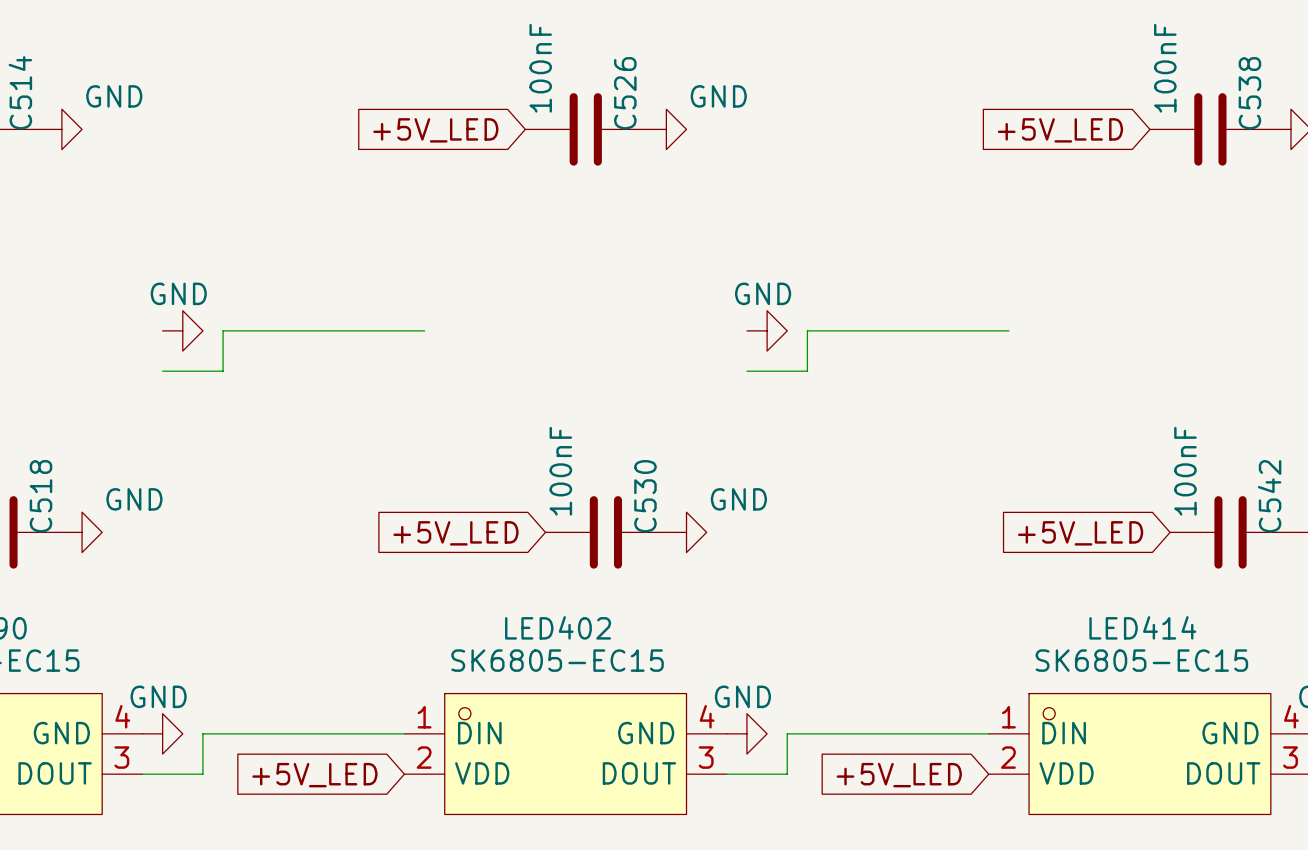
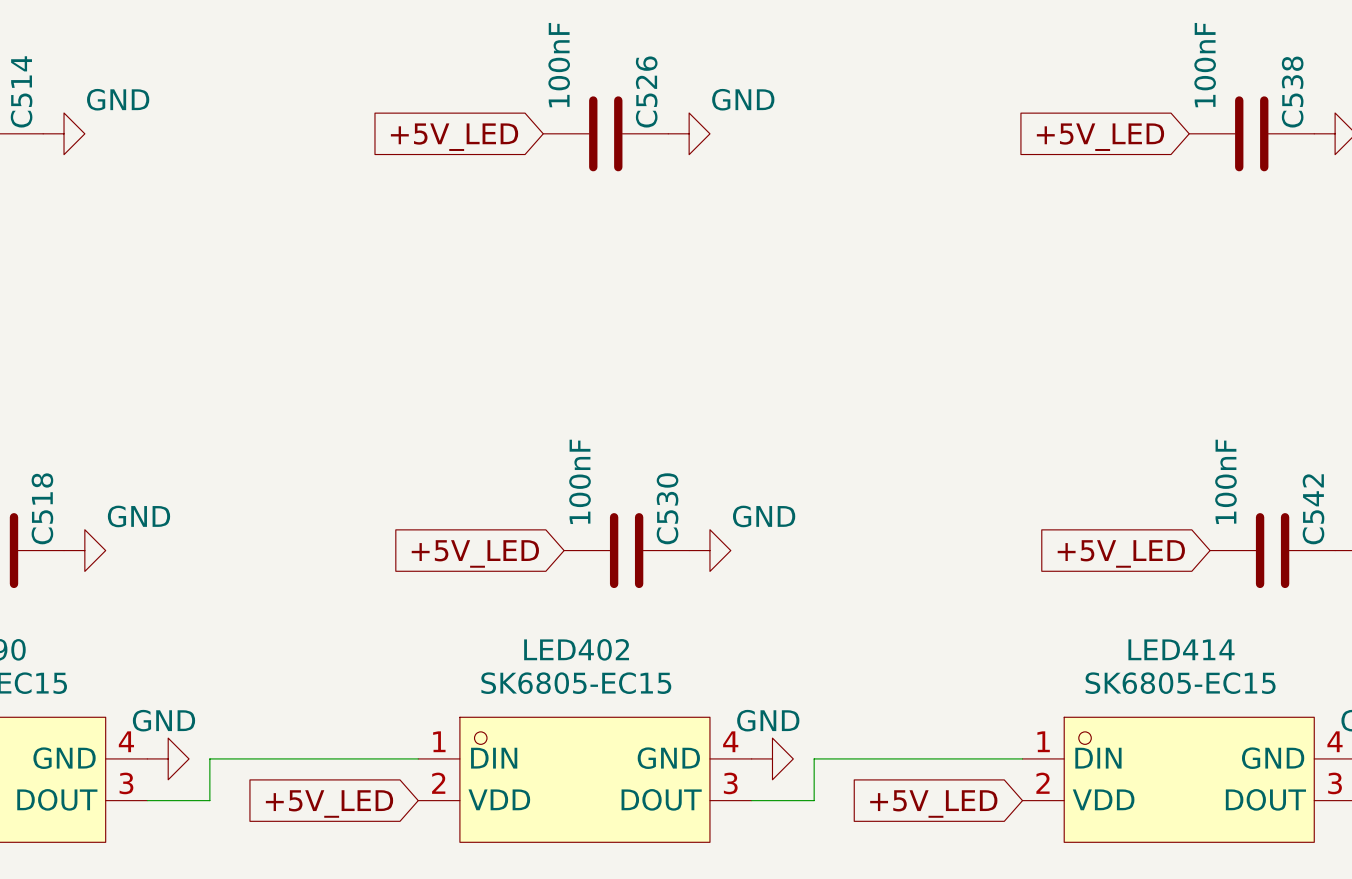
power symbol: GND (182, 330) -> none
wire: (424, 330) (223, 330) (223, 371) (162, 371) -> none
power symbol: GND (767, 330) -> none
wire: (1008, 330) (807, 330) (807, 371) (746, 371) -> none

